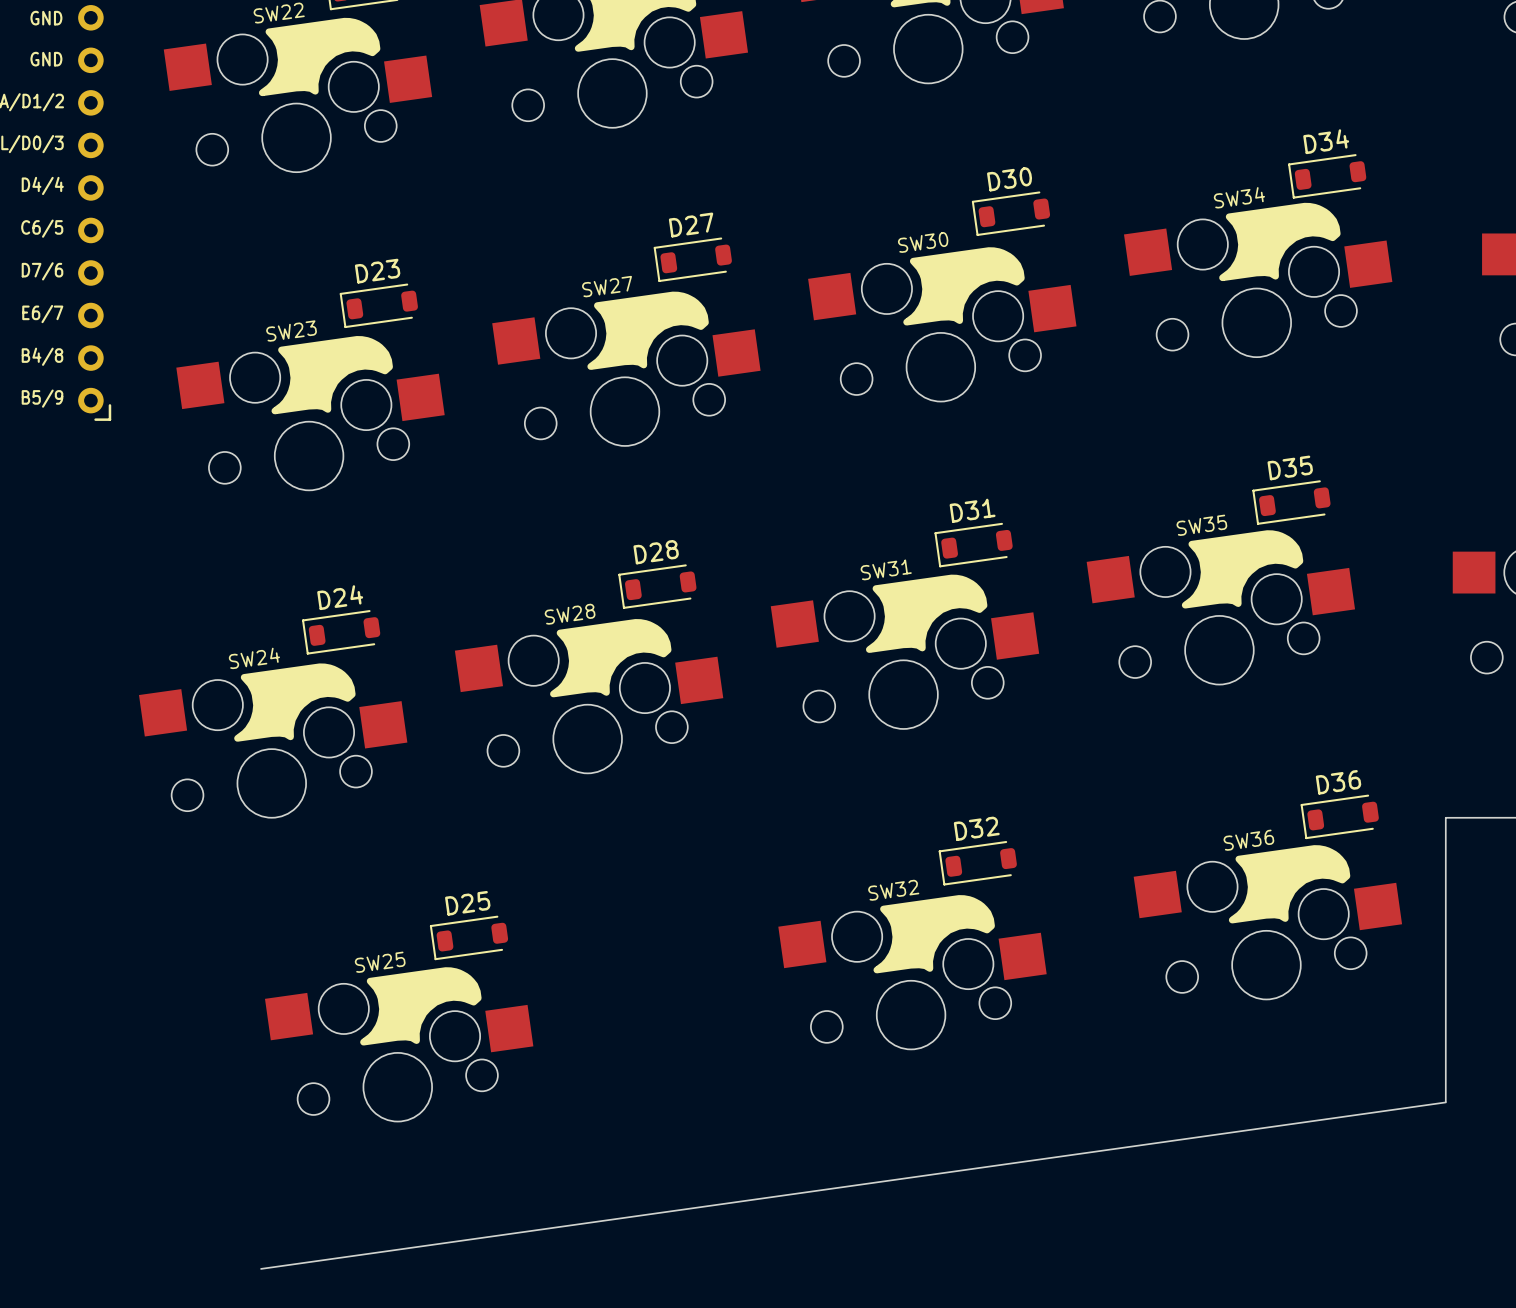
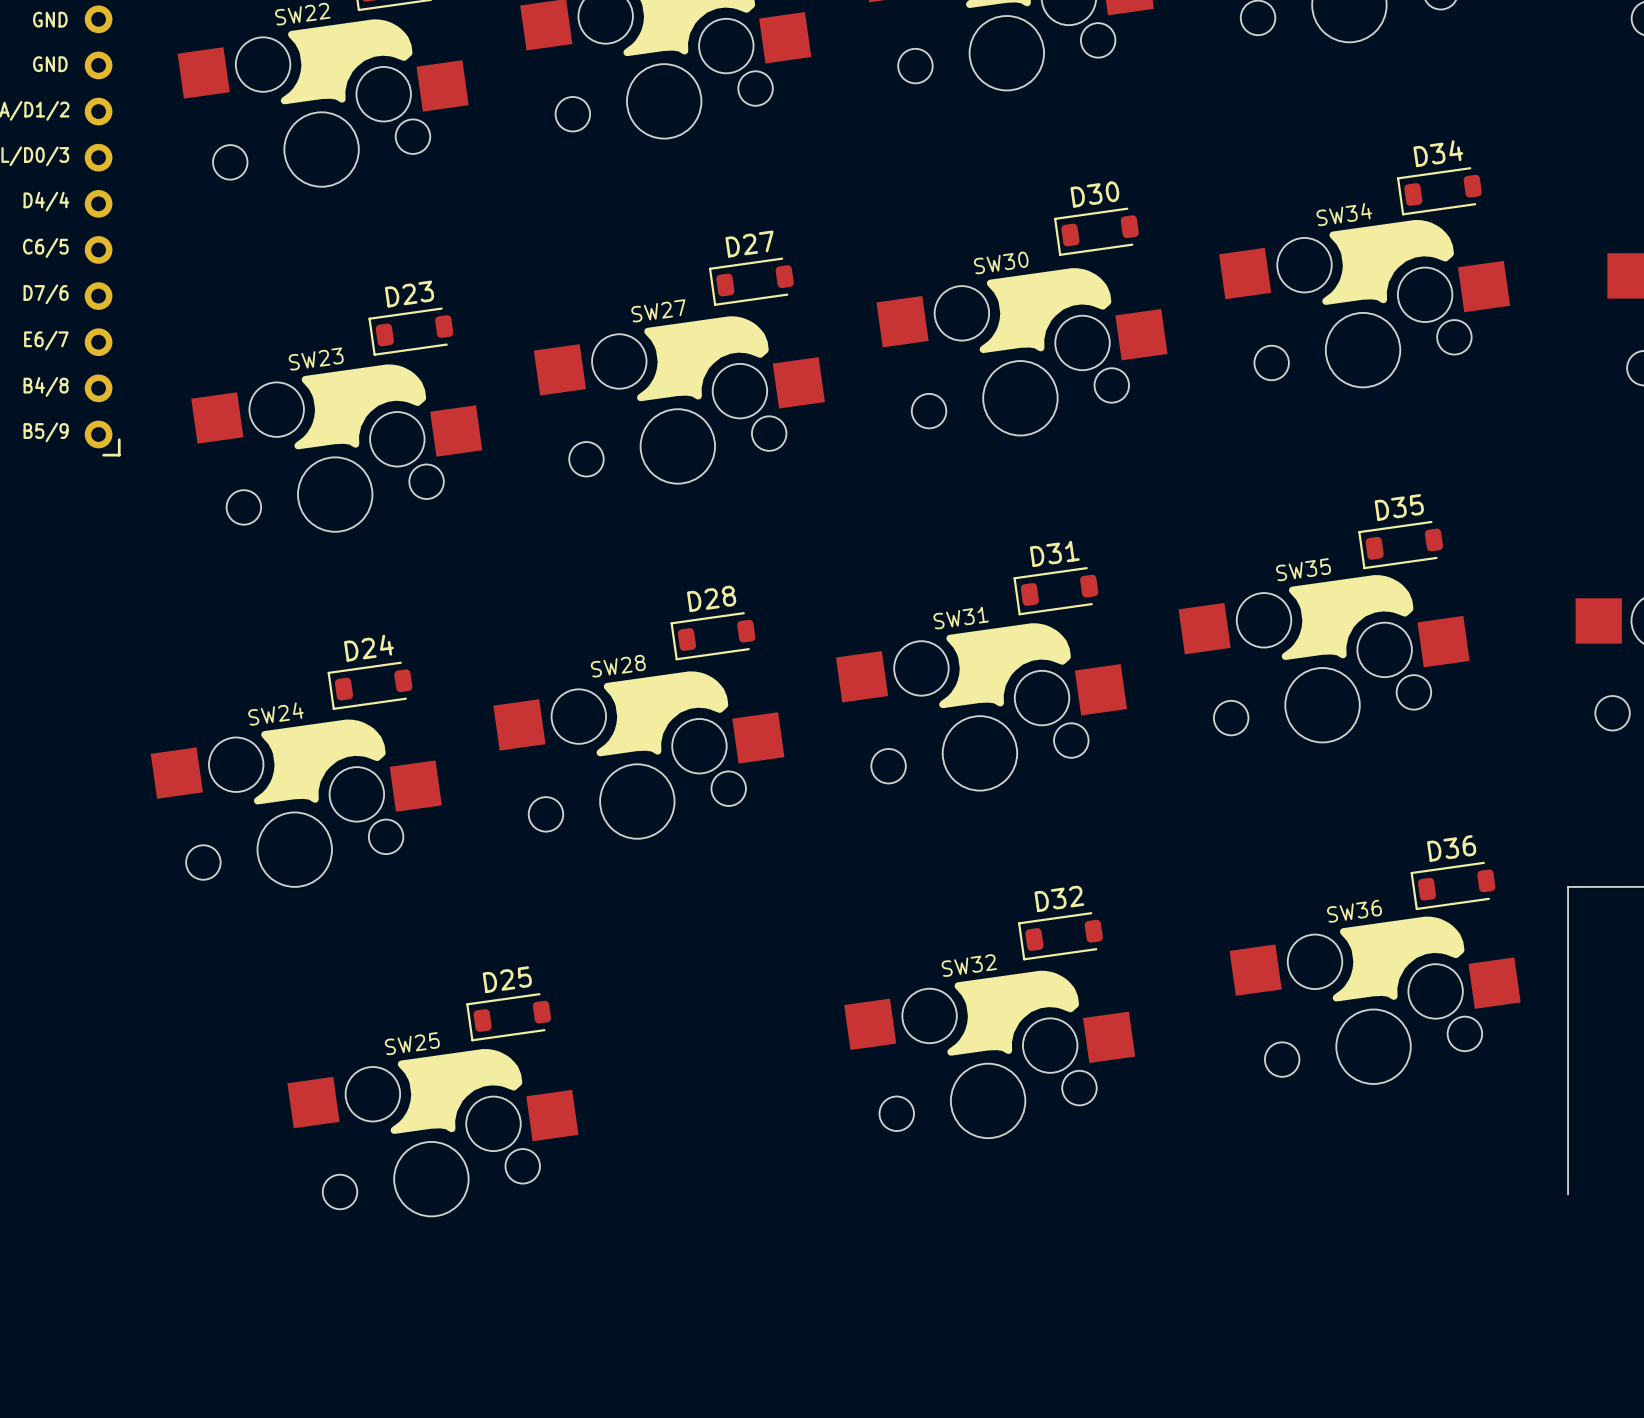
board edge: (1445, 1102) (261, 1268) -> none

